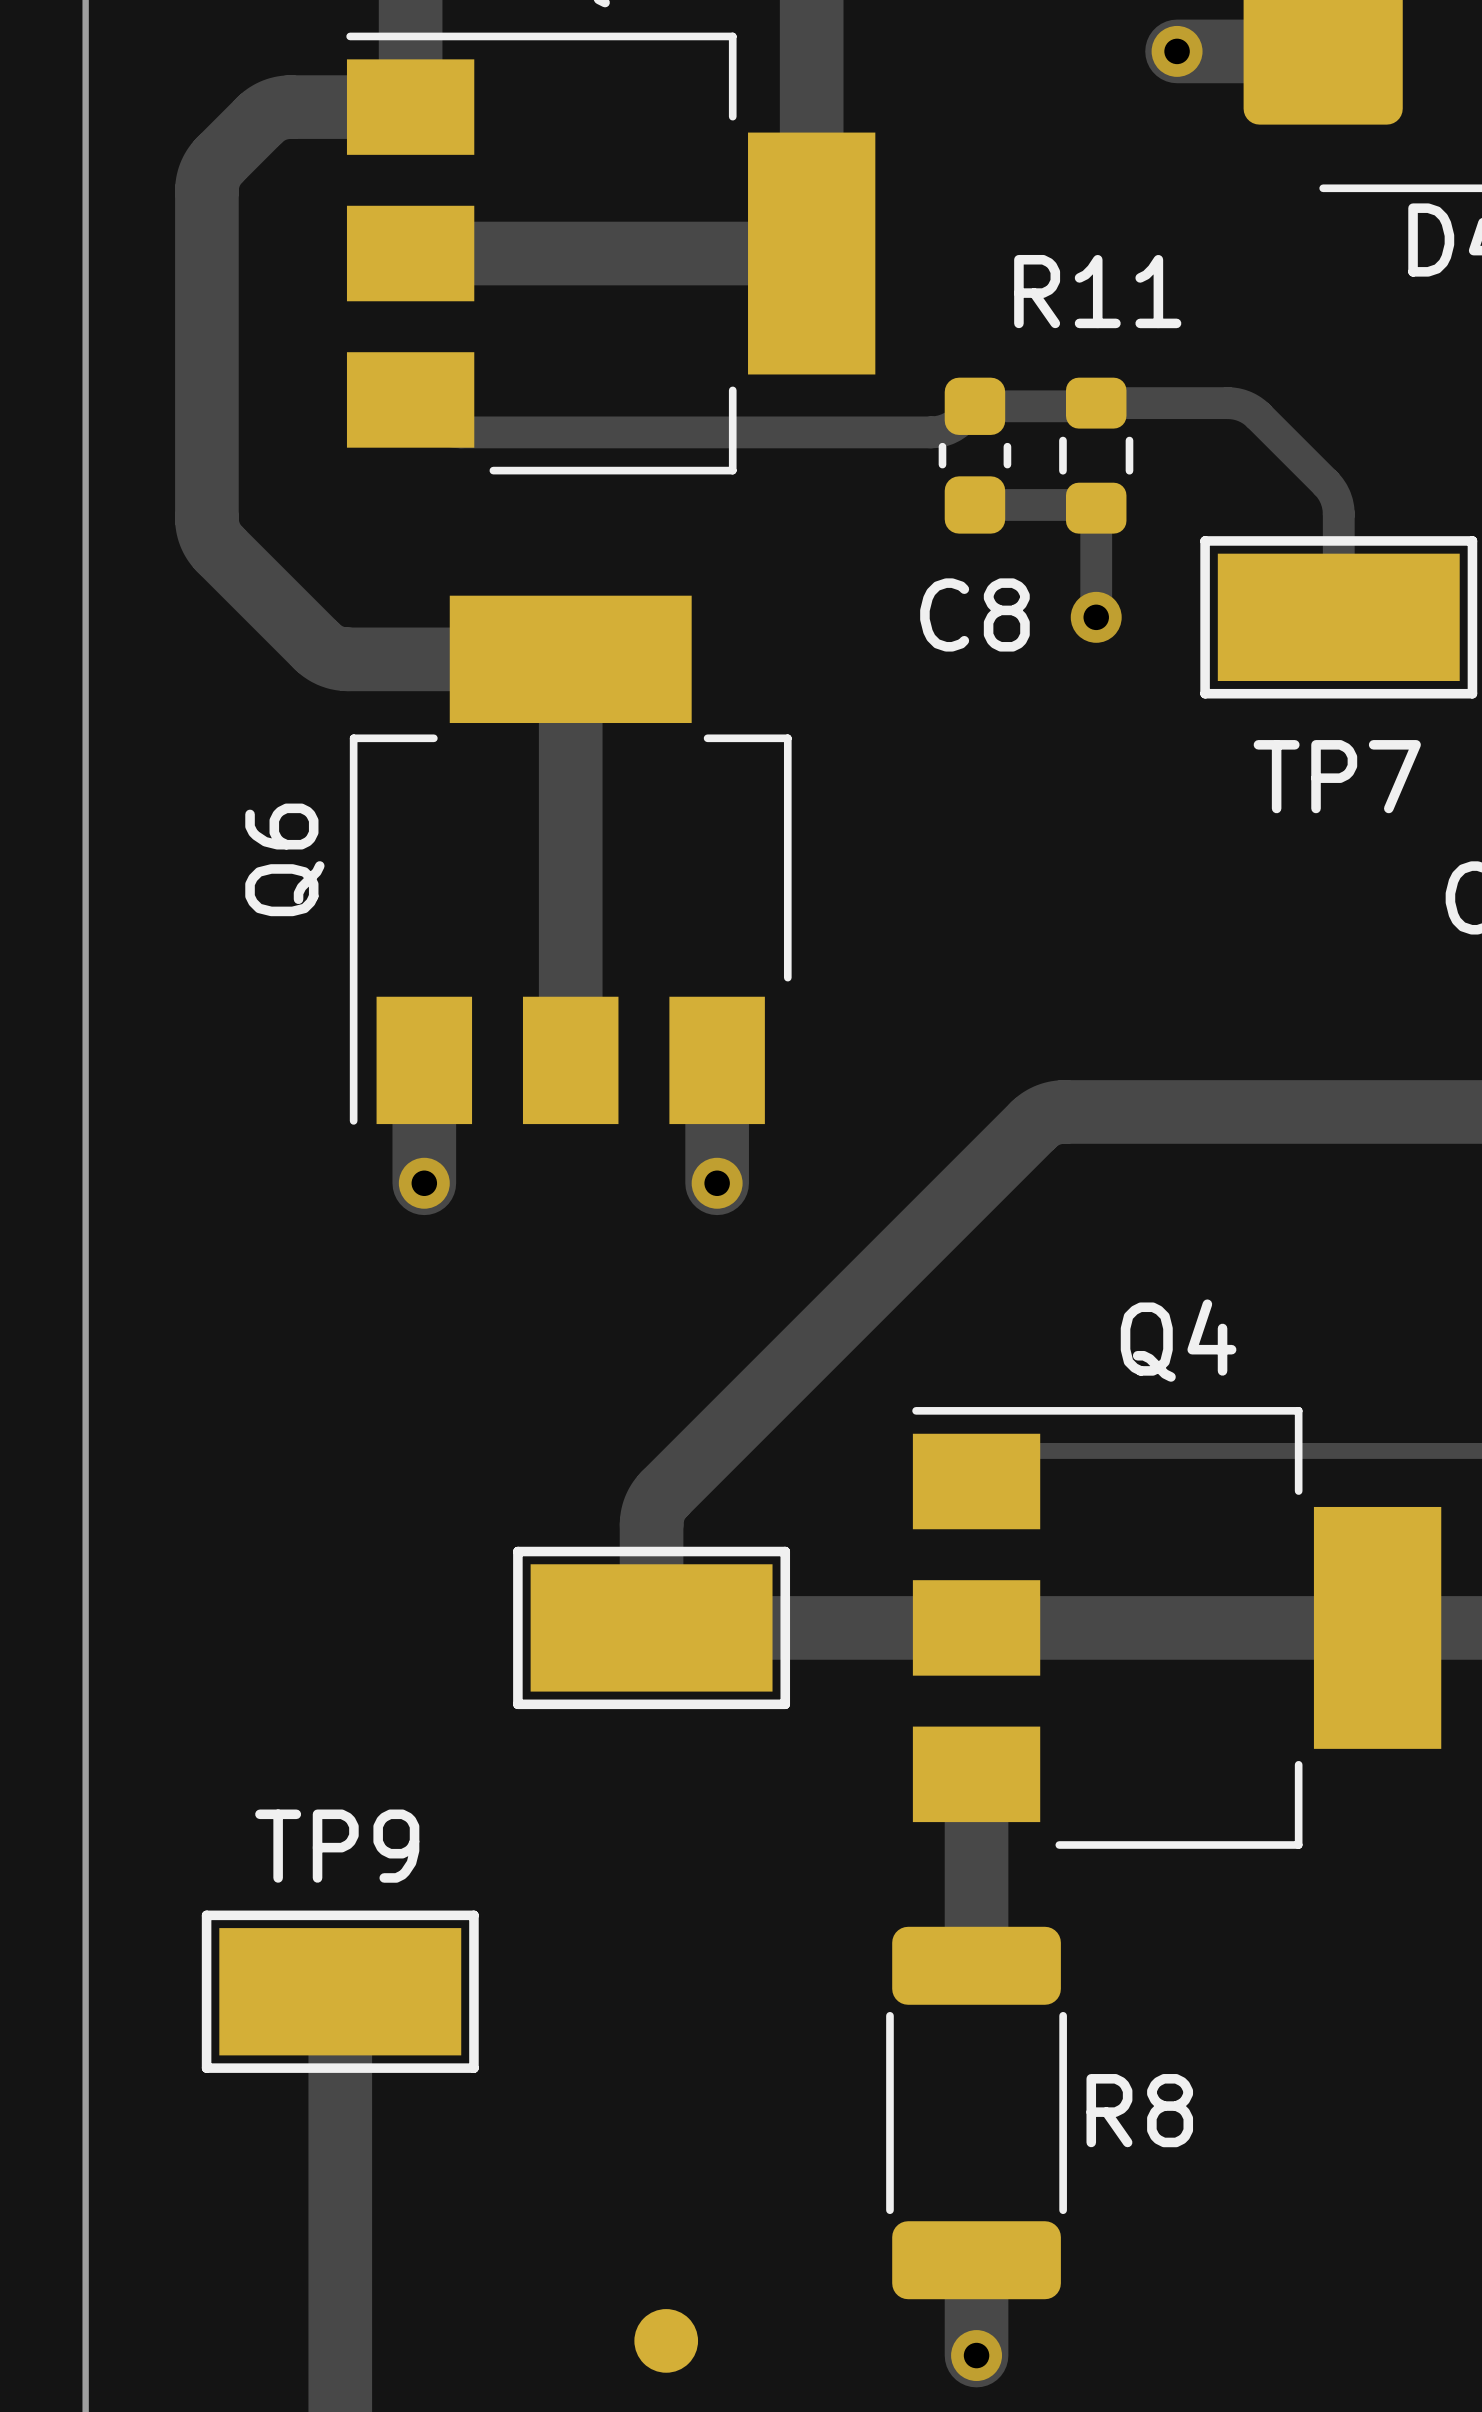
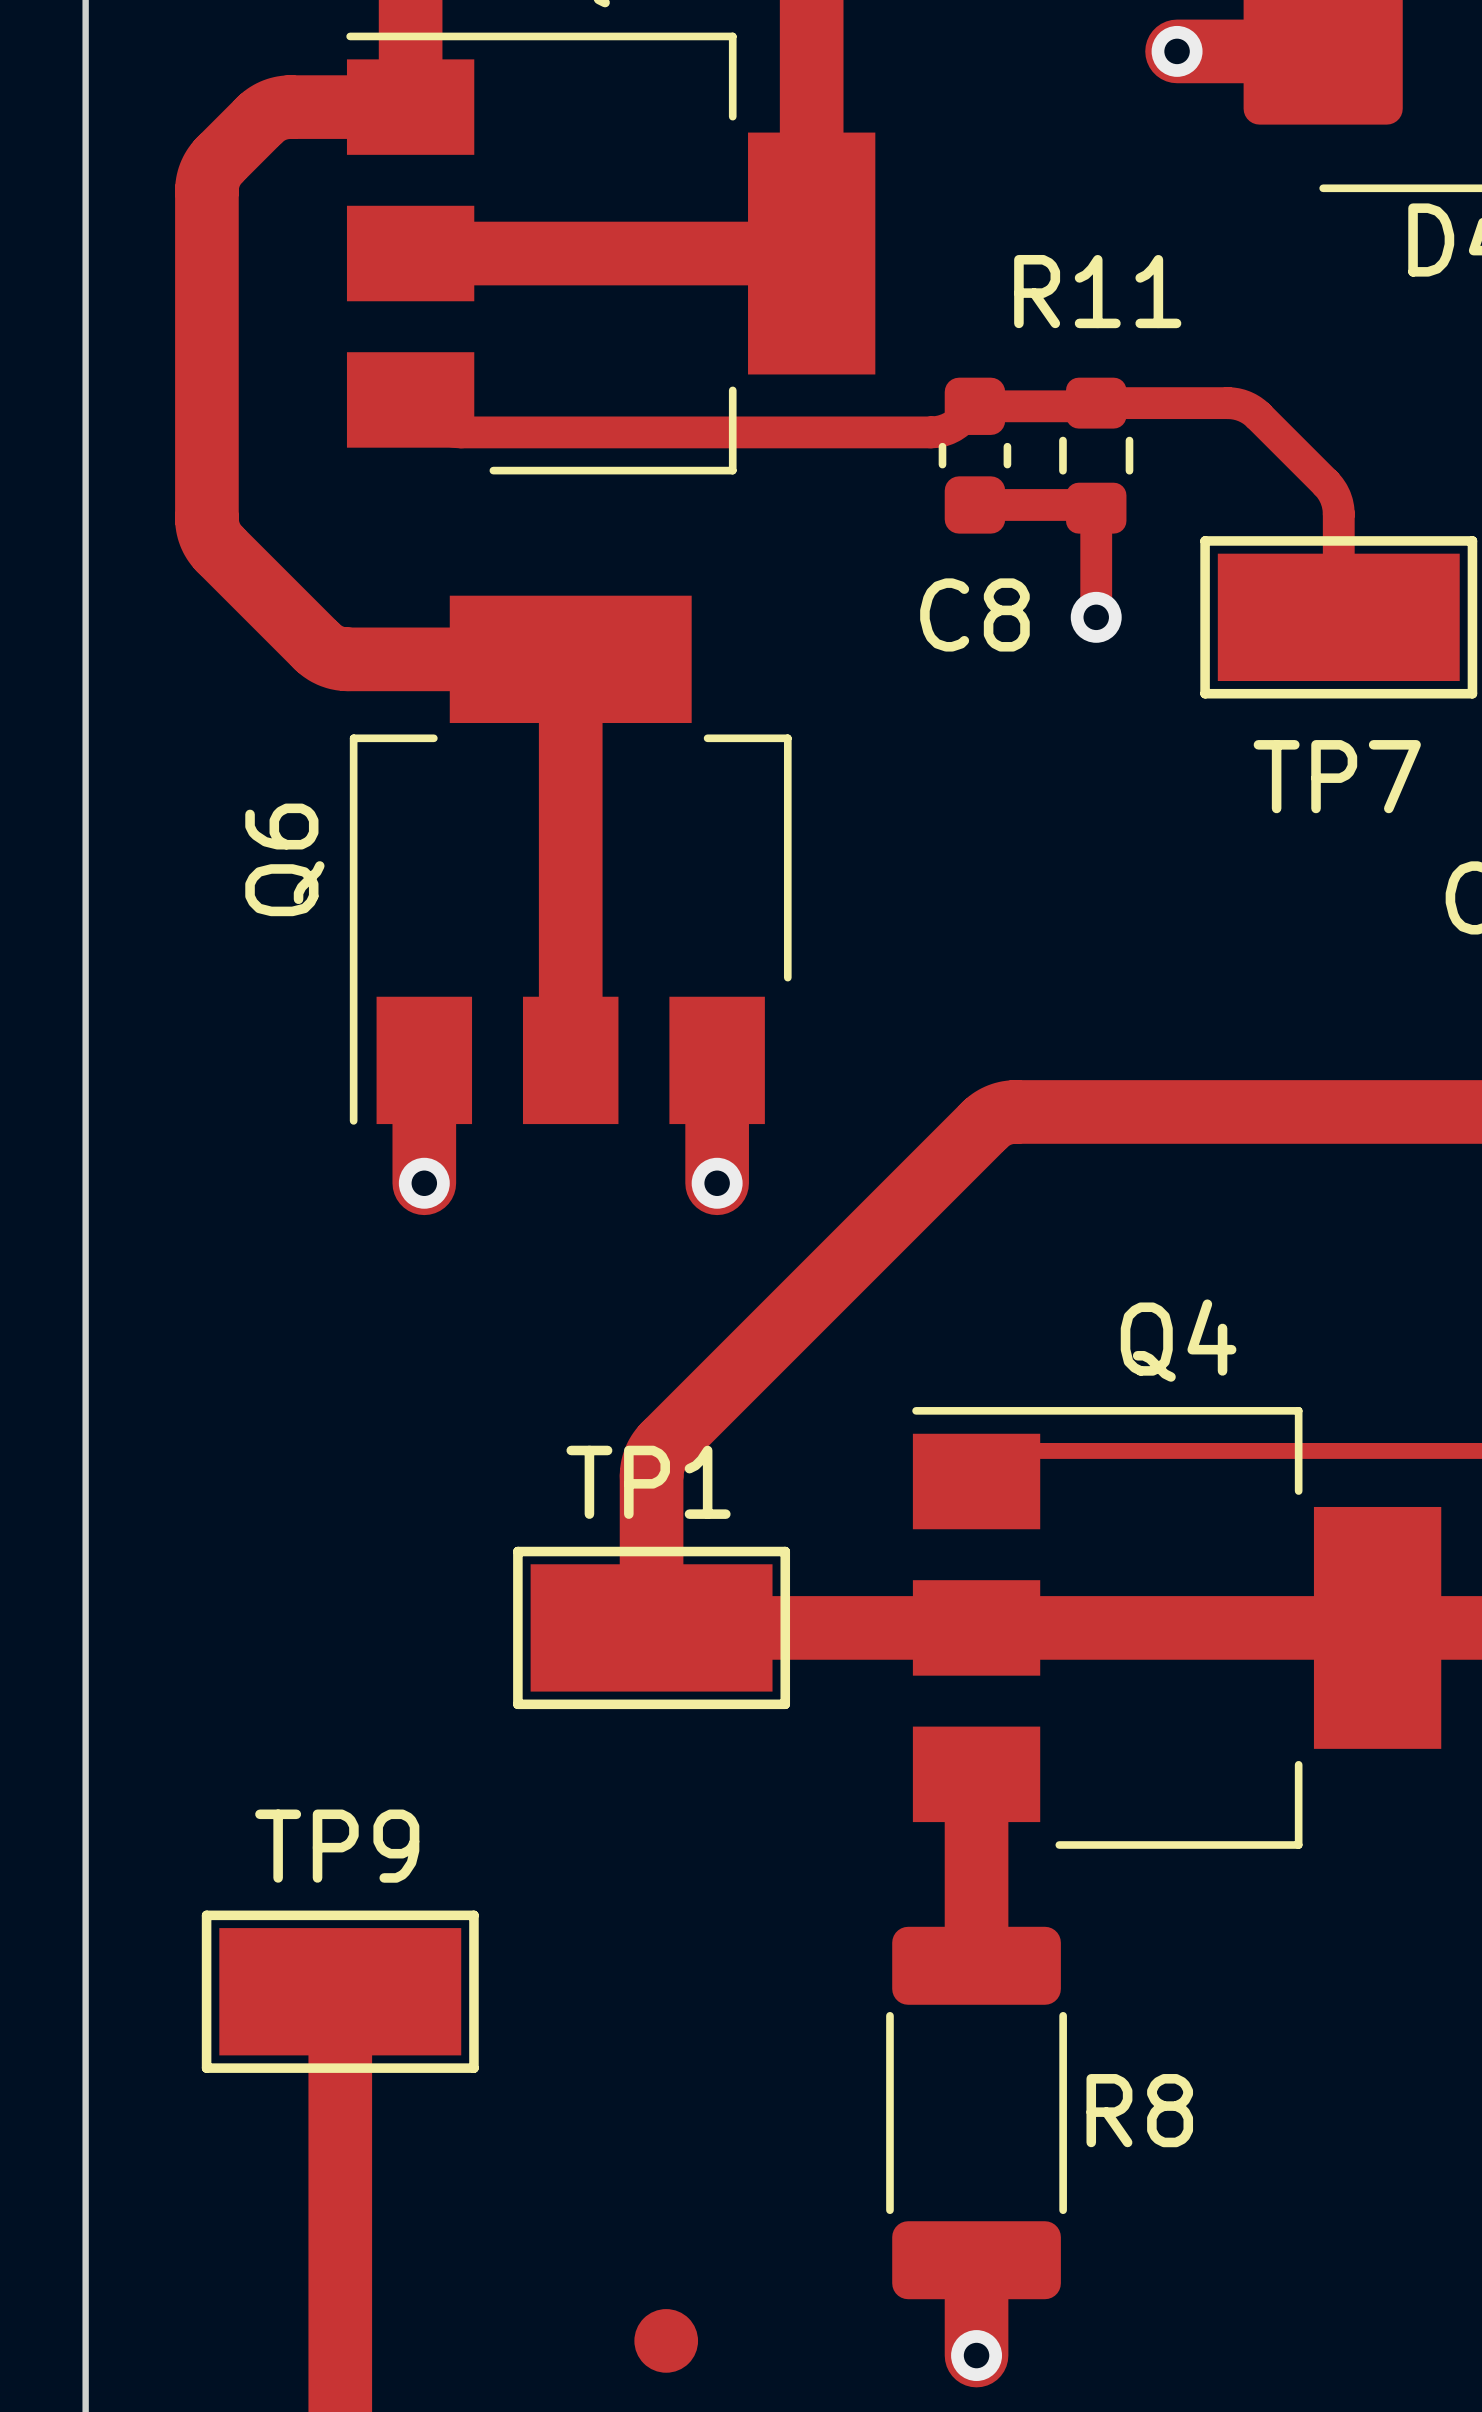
track: (1064, 1111) (1047, 1115) (1033, 1124) (664, 1493) (654, 1508) (651, 1524) -> (1064, 1111) (1011, 1112) (998, 1115) (988, 1121) (664, 1445) (656, 1455) (652, 1467) (651, 1524)
TP1 name: none -> TP1 (648, 1482)

